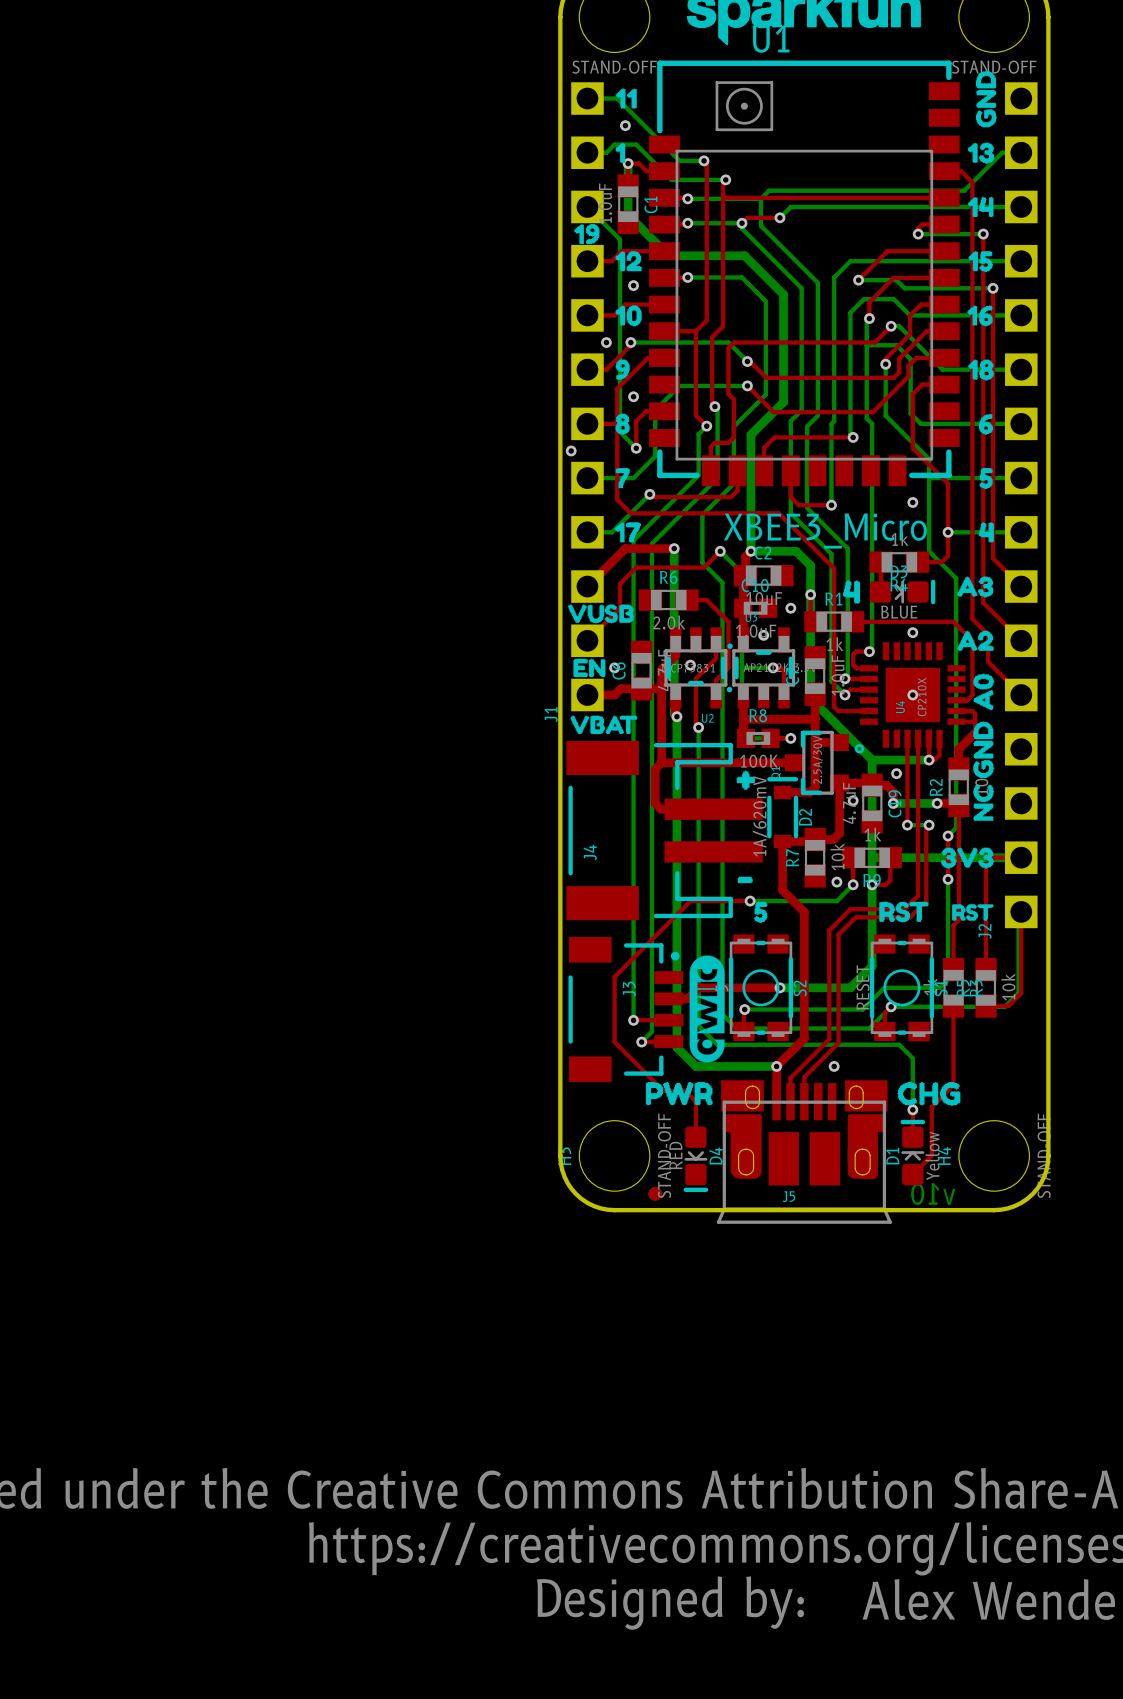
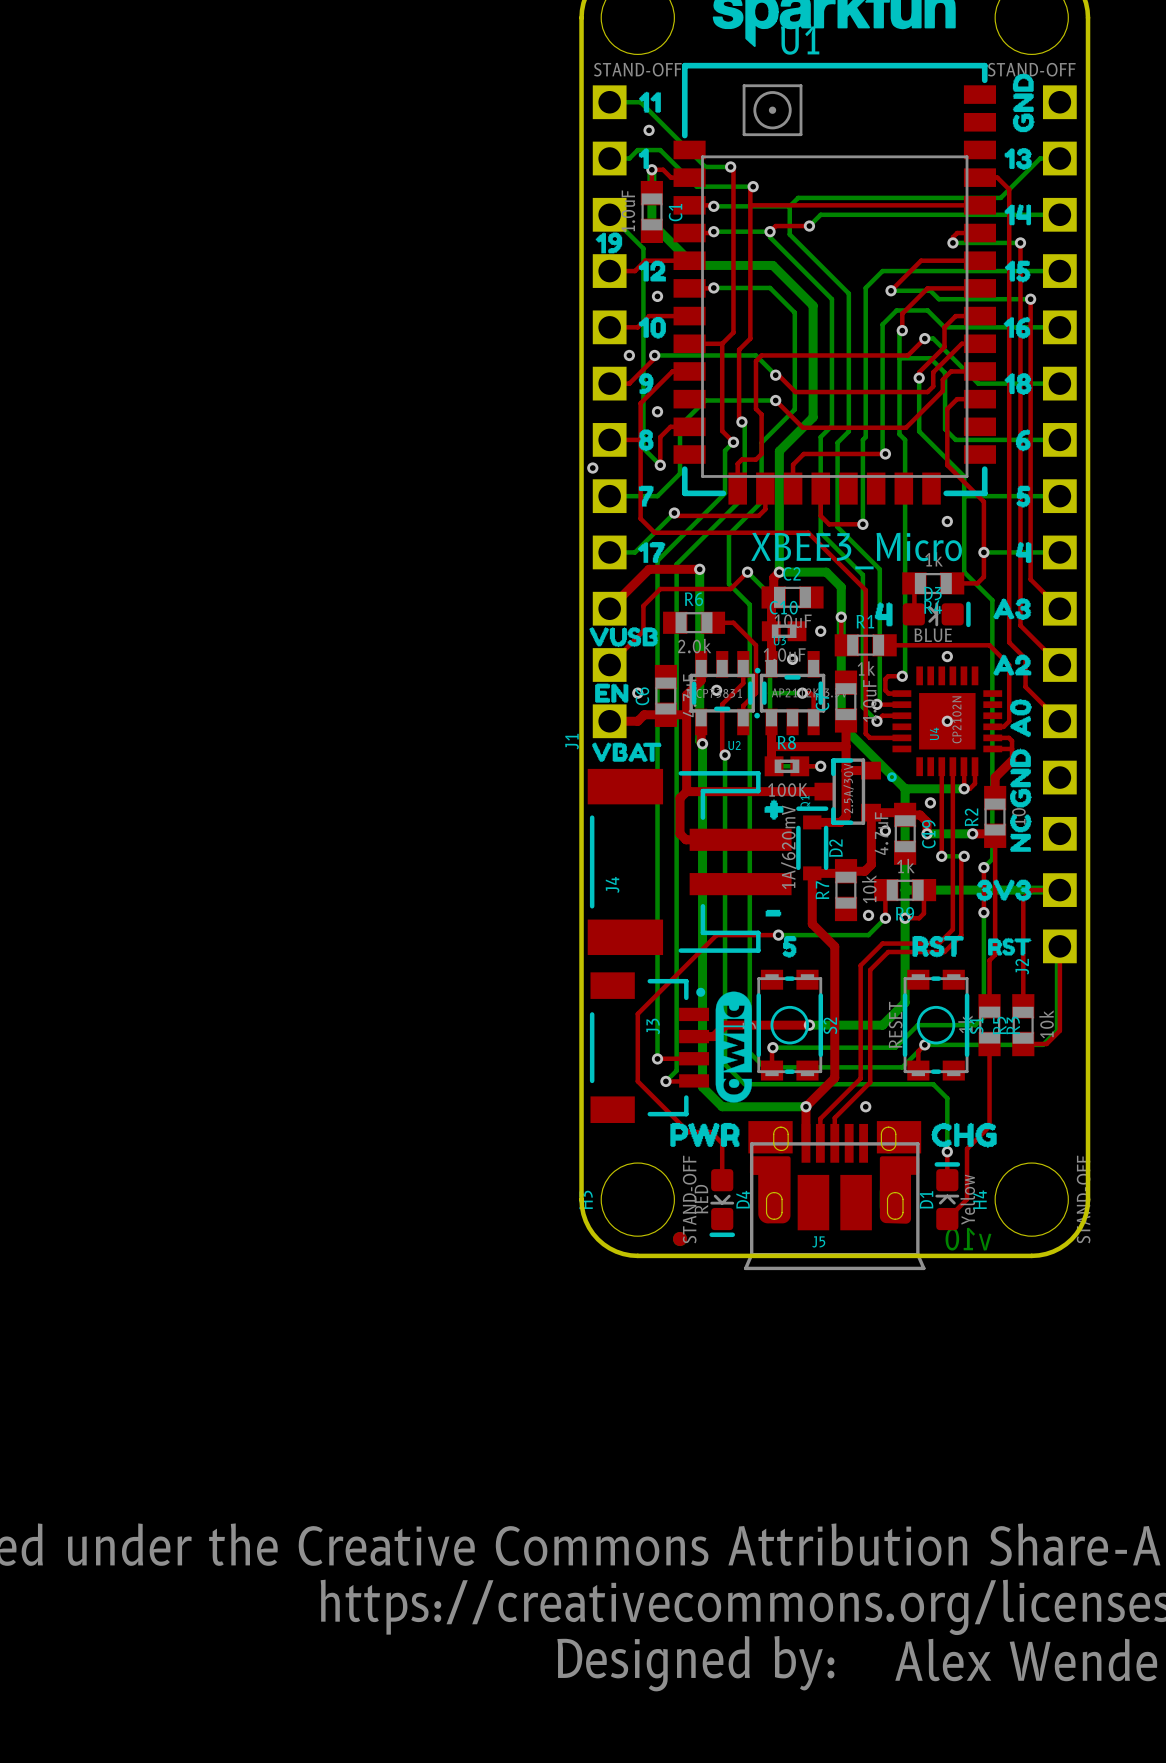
U4 value: CP210X (922, 697) -> CP2102N (956, 719)

